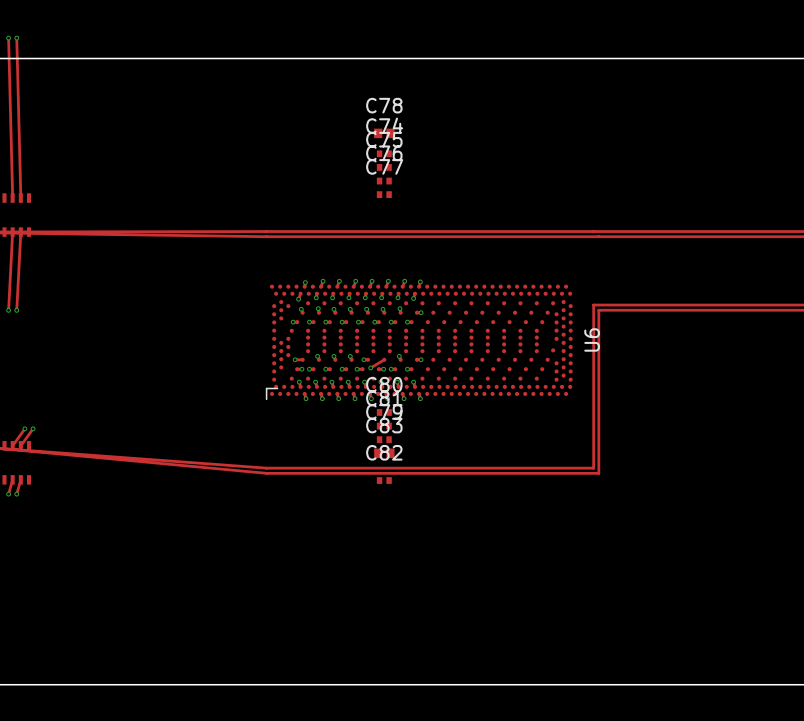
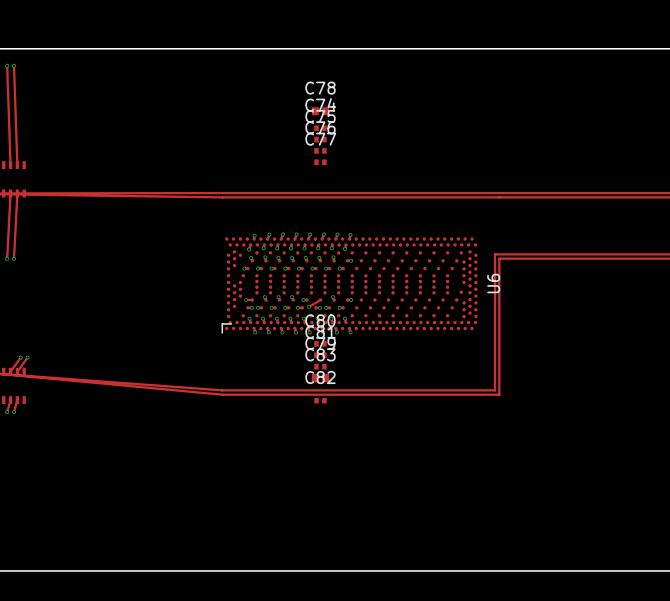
track: (8, 38) (12, 198) -> (7, 65) (10, 165)
via: (8, 38) -> none
track: (16, 38) (20, 198) -> (13, 65) (17, 165)
via: (16, 38) -> none
via: none -> (7, 65)
via: none -> (13, 65)

